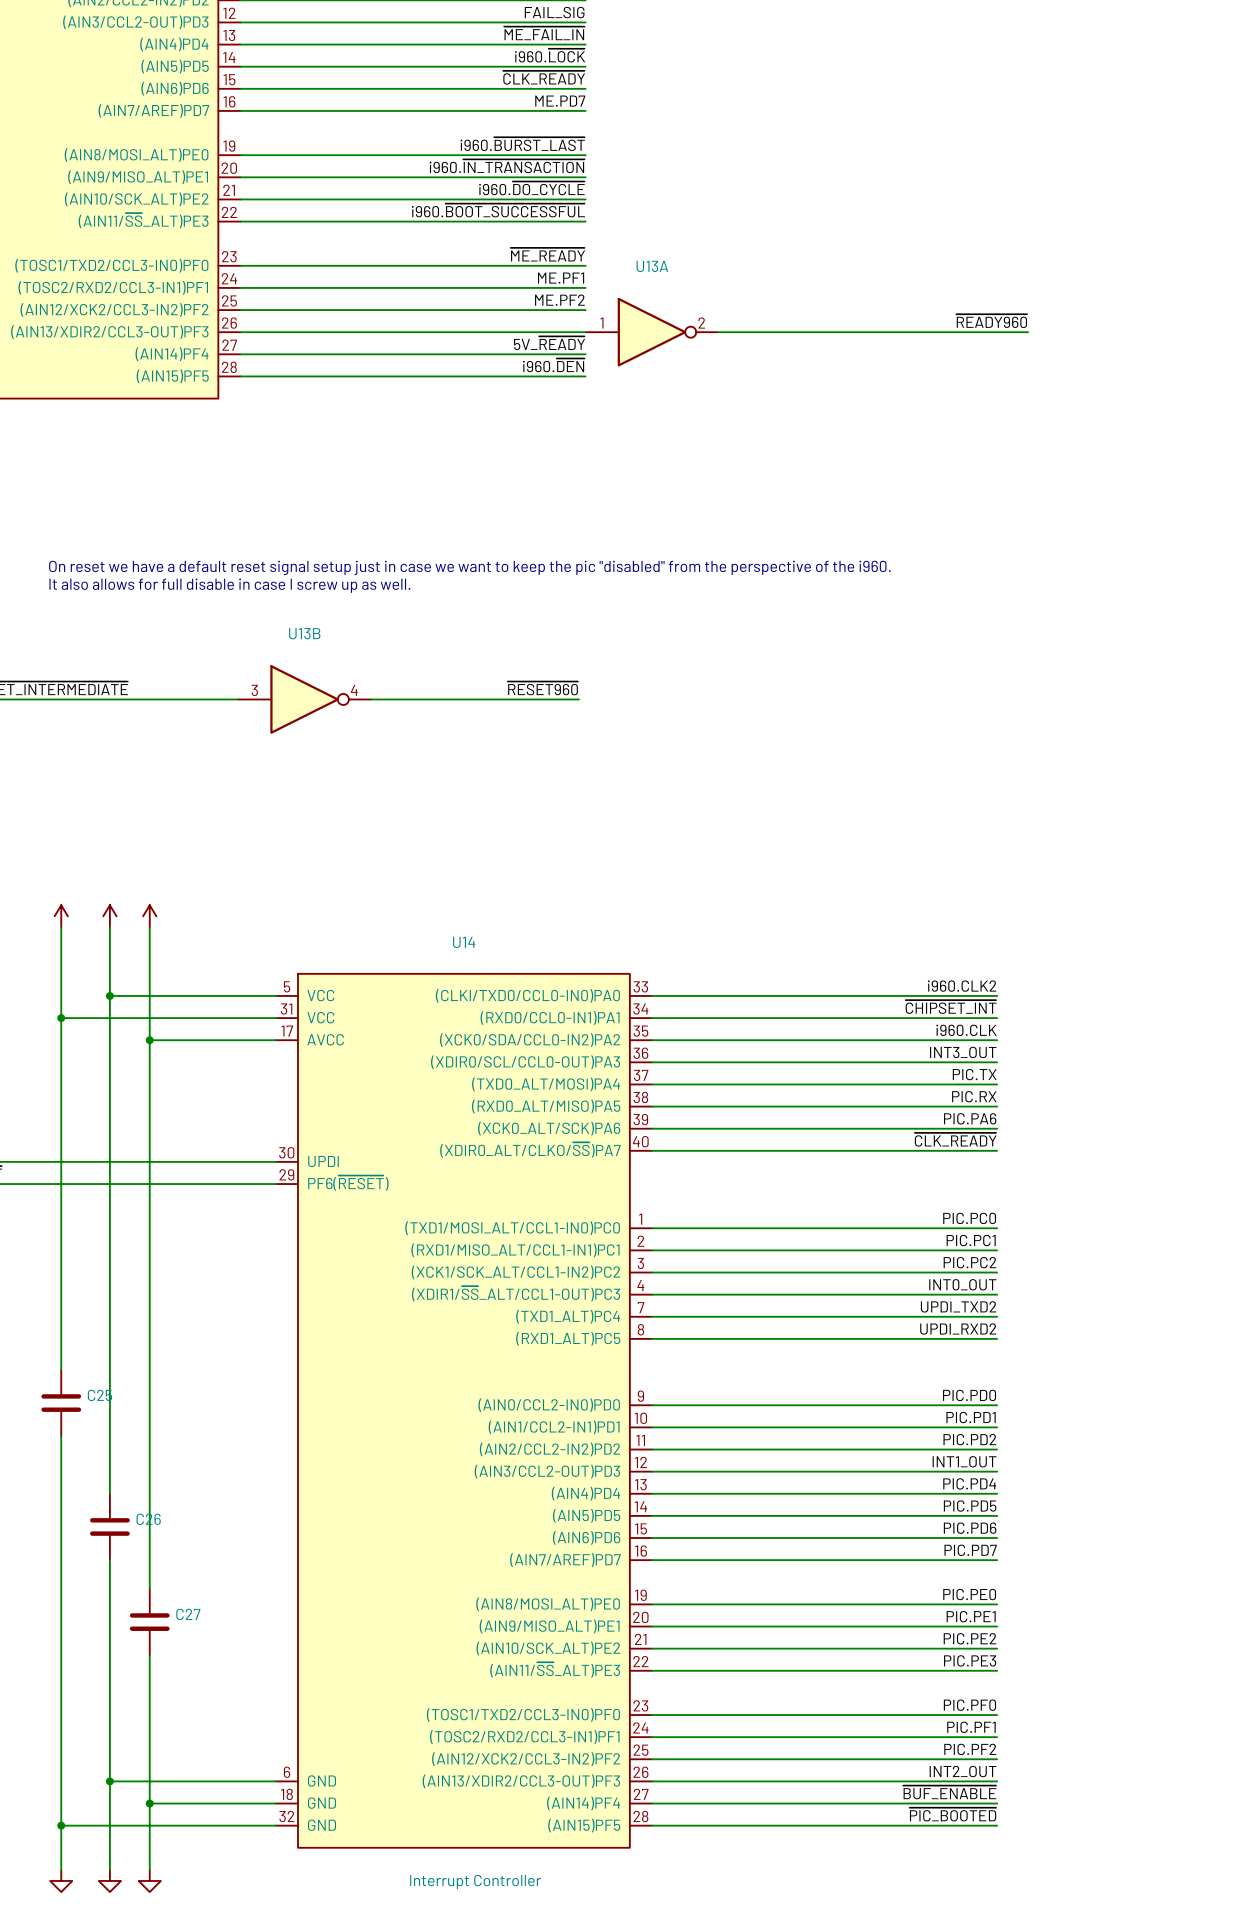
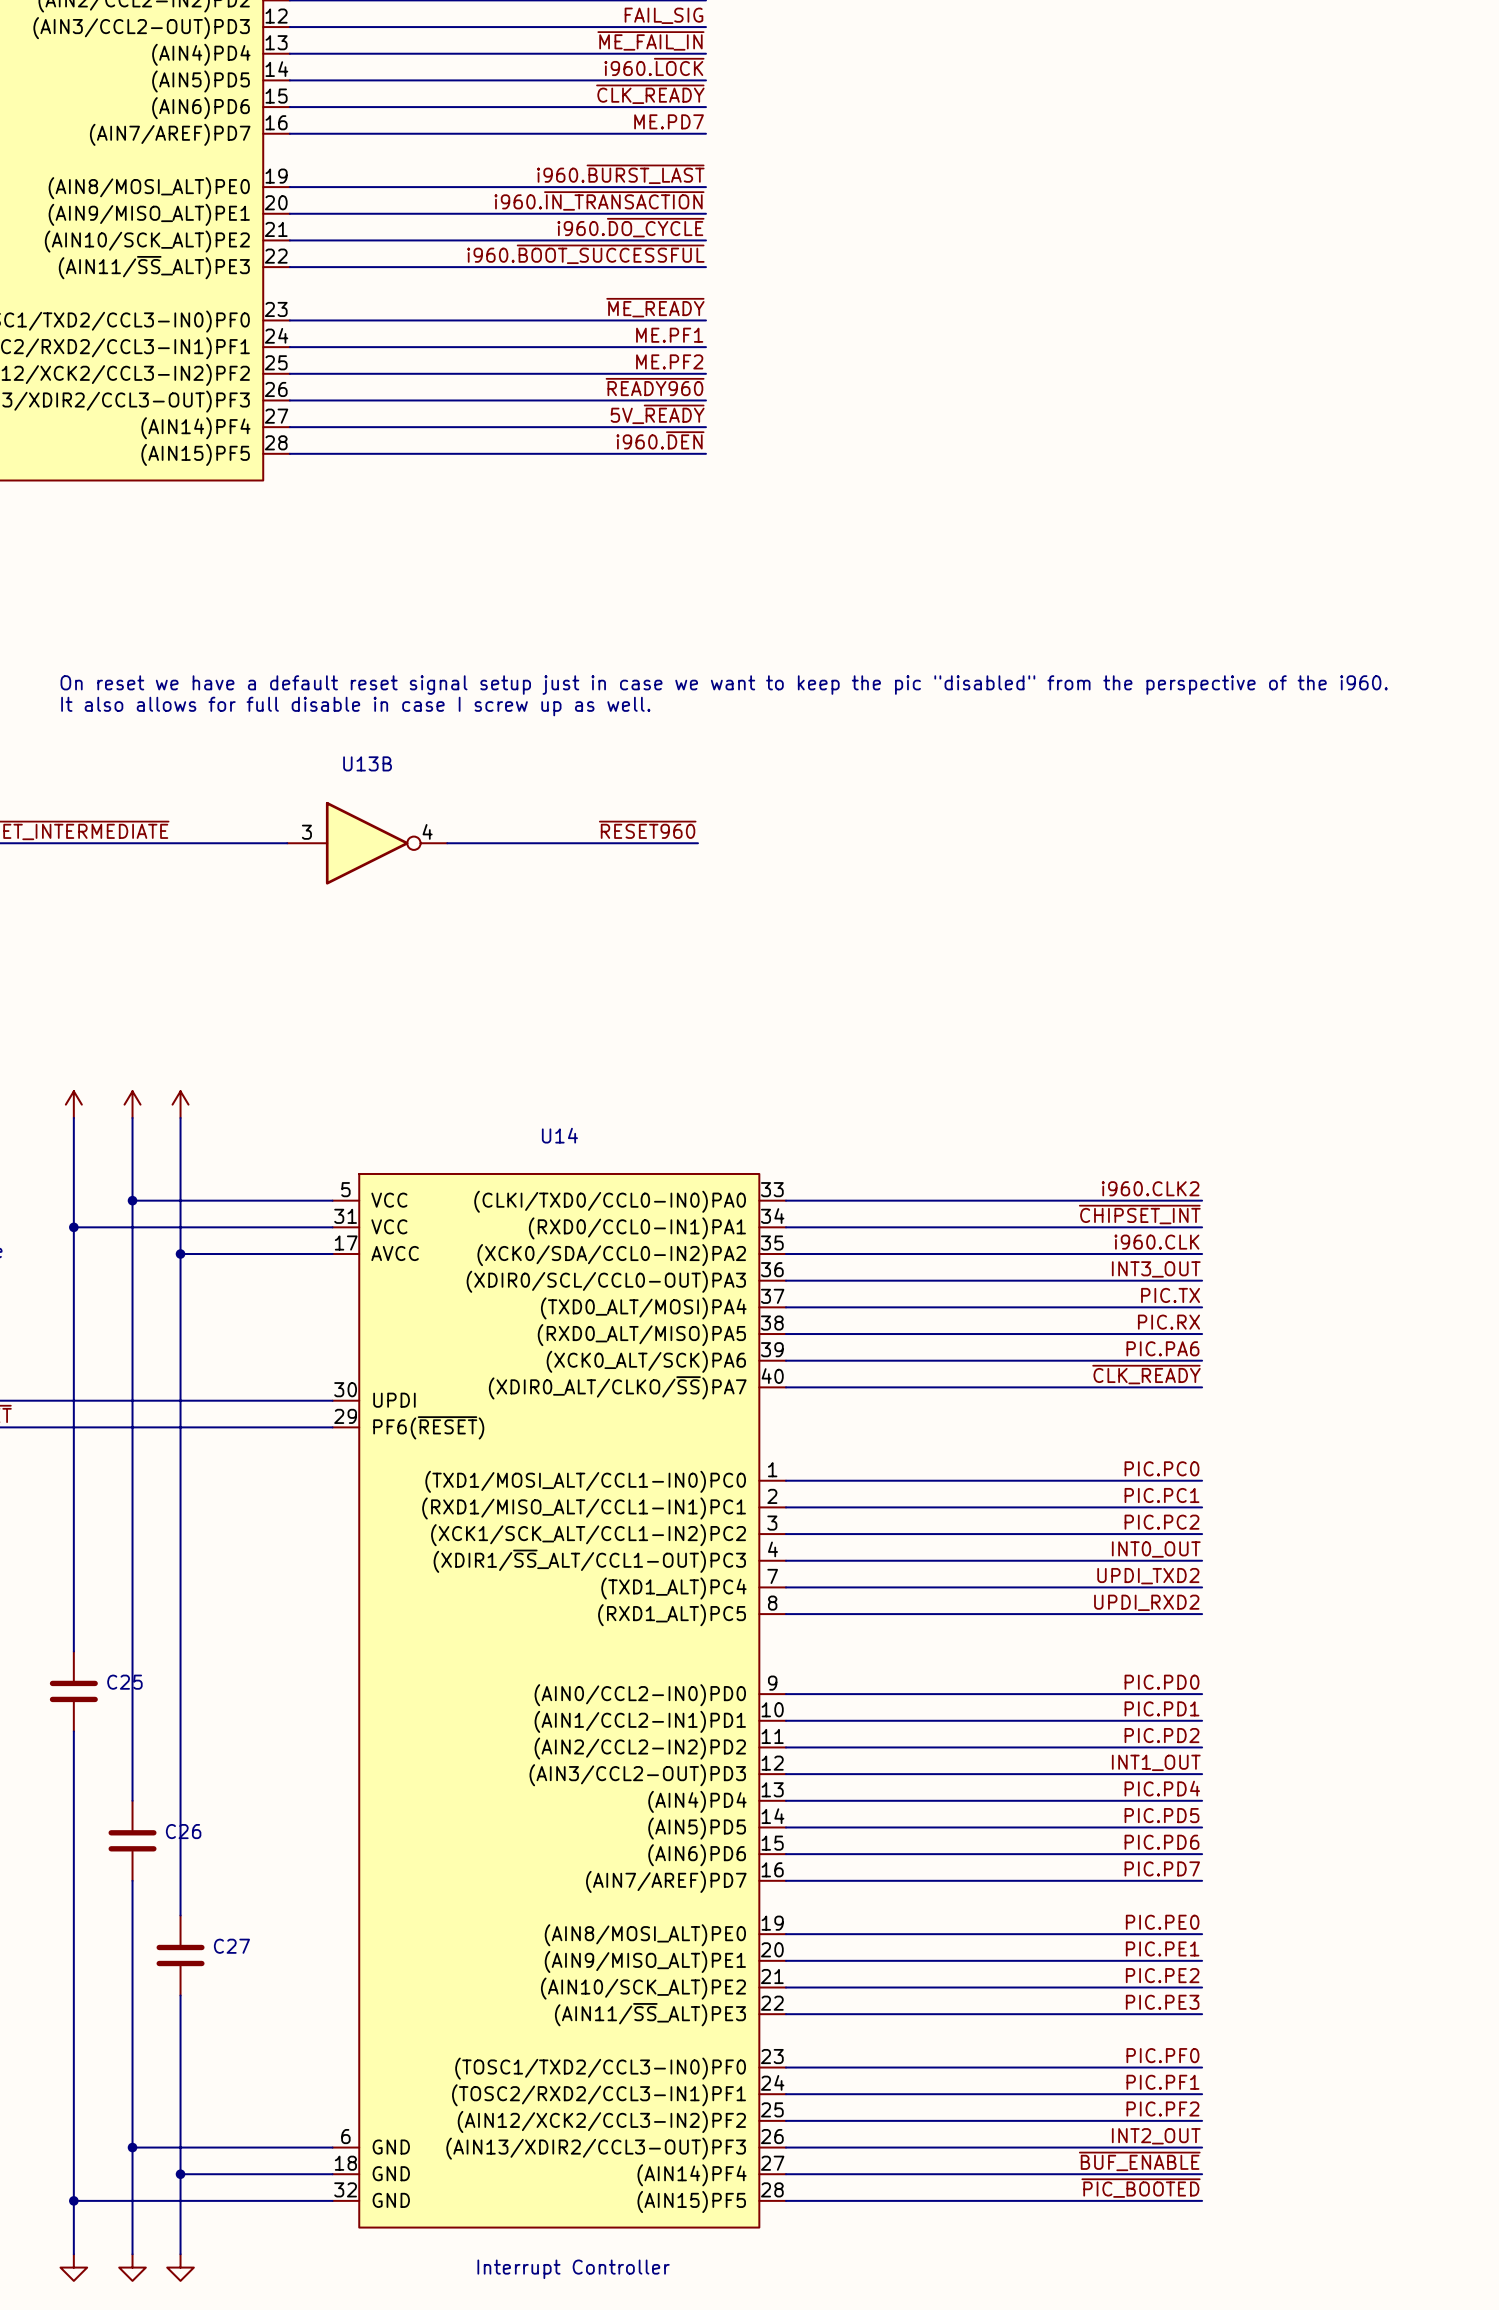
label: none -> ~{READY960} (655, 387)
label: ~{READY960} (991, 321) -> none
U13A: (652, 332) -> none
wire: (718, 332) (1028, 332) -> none

